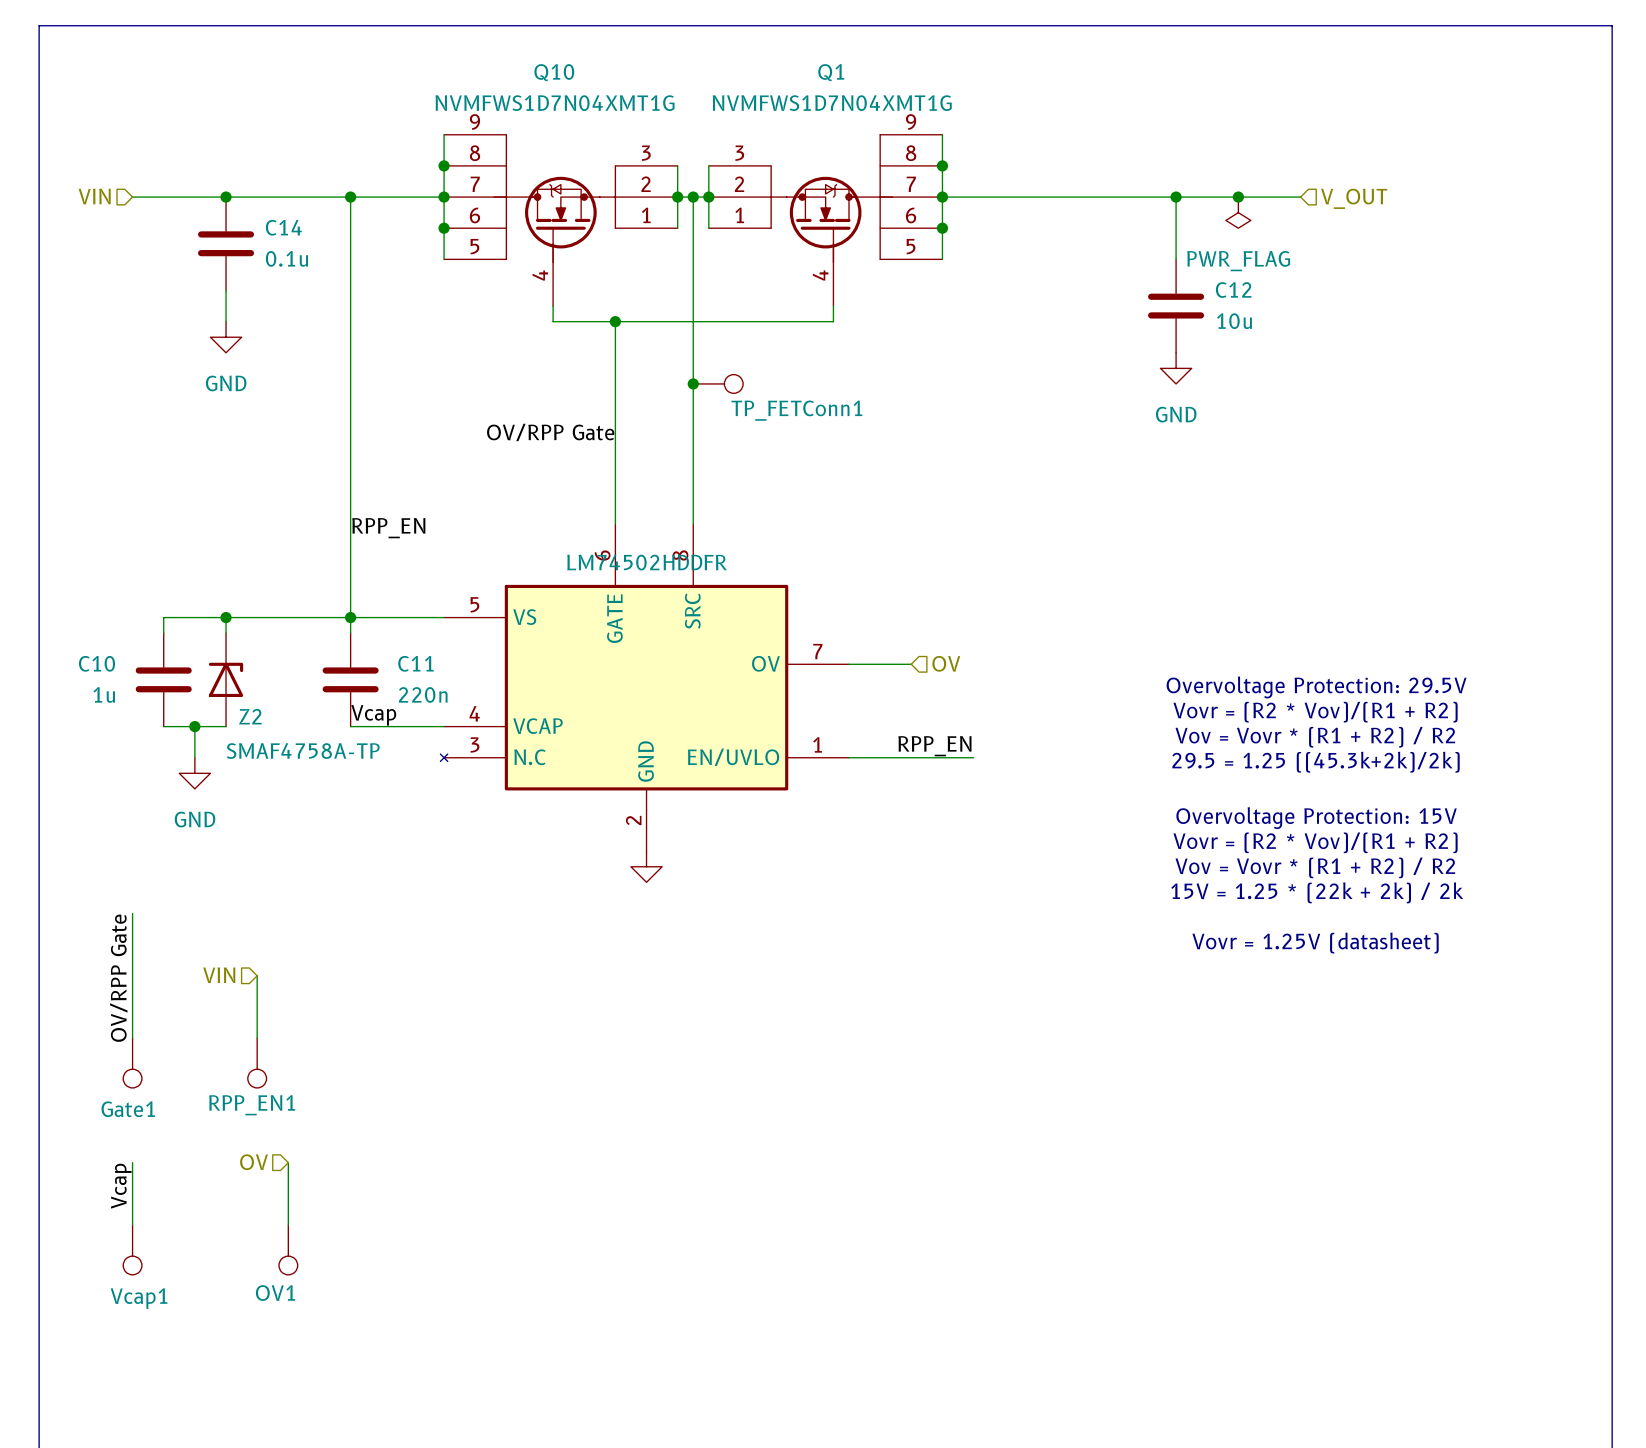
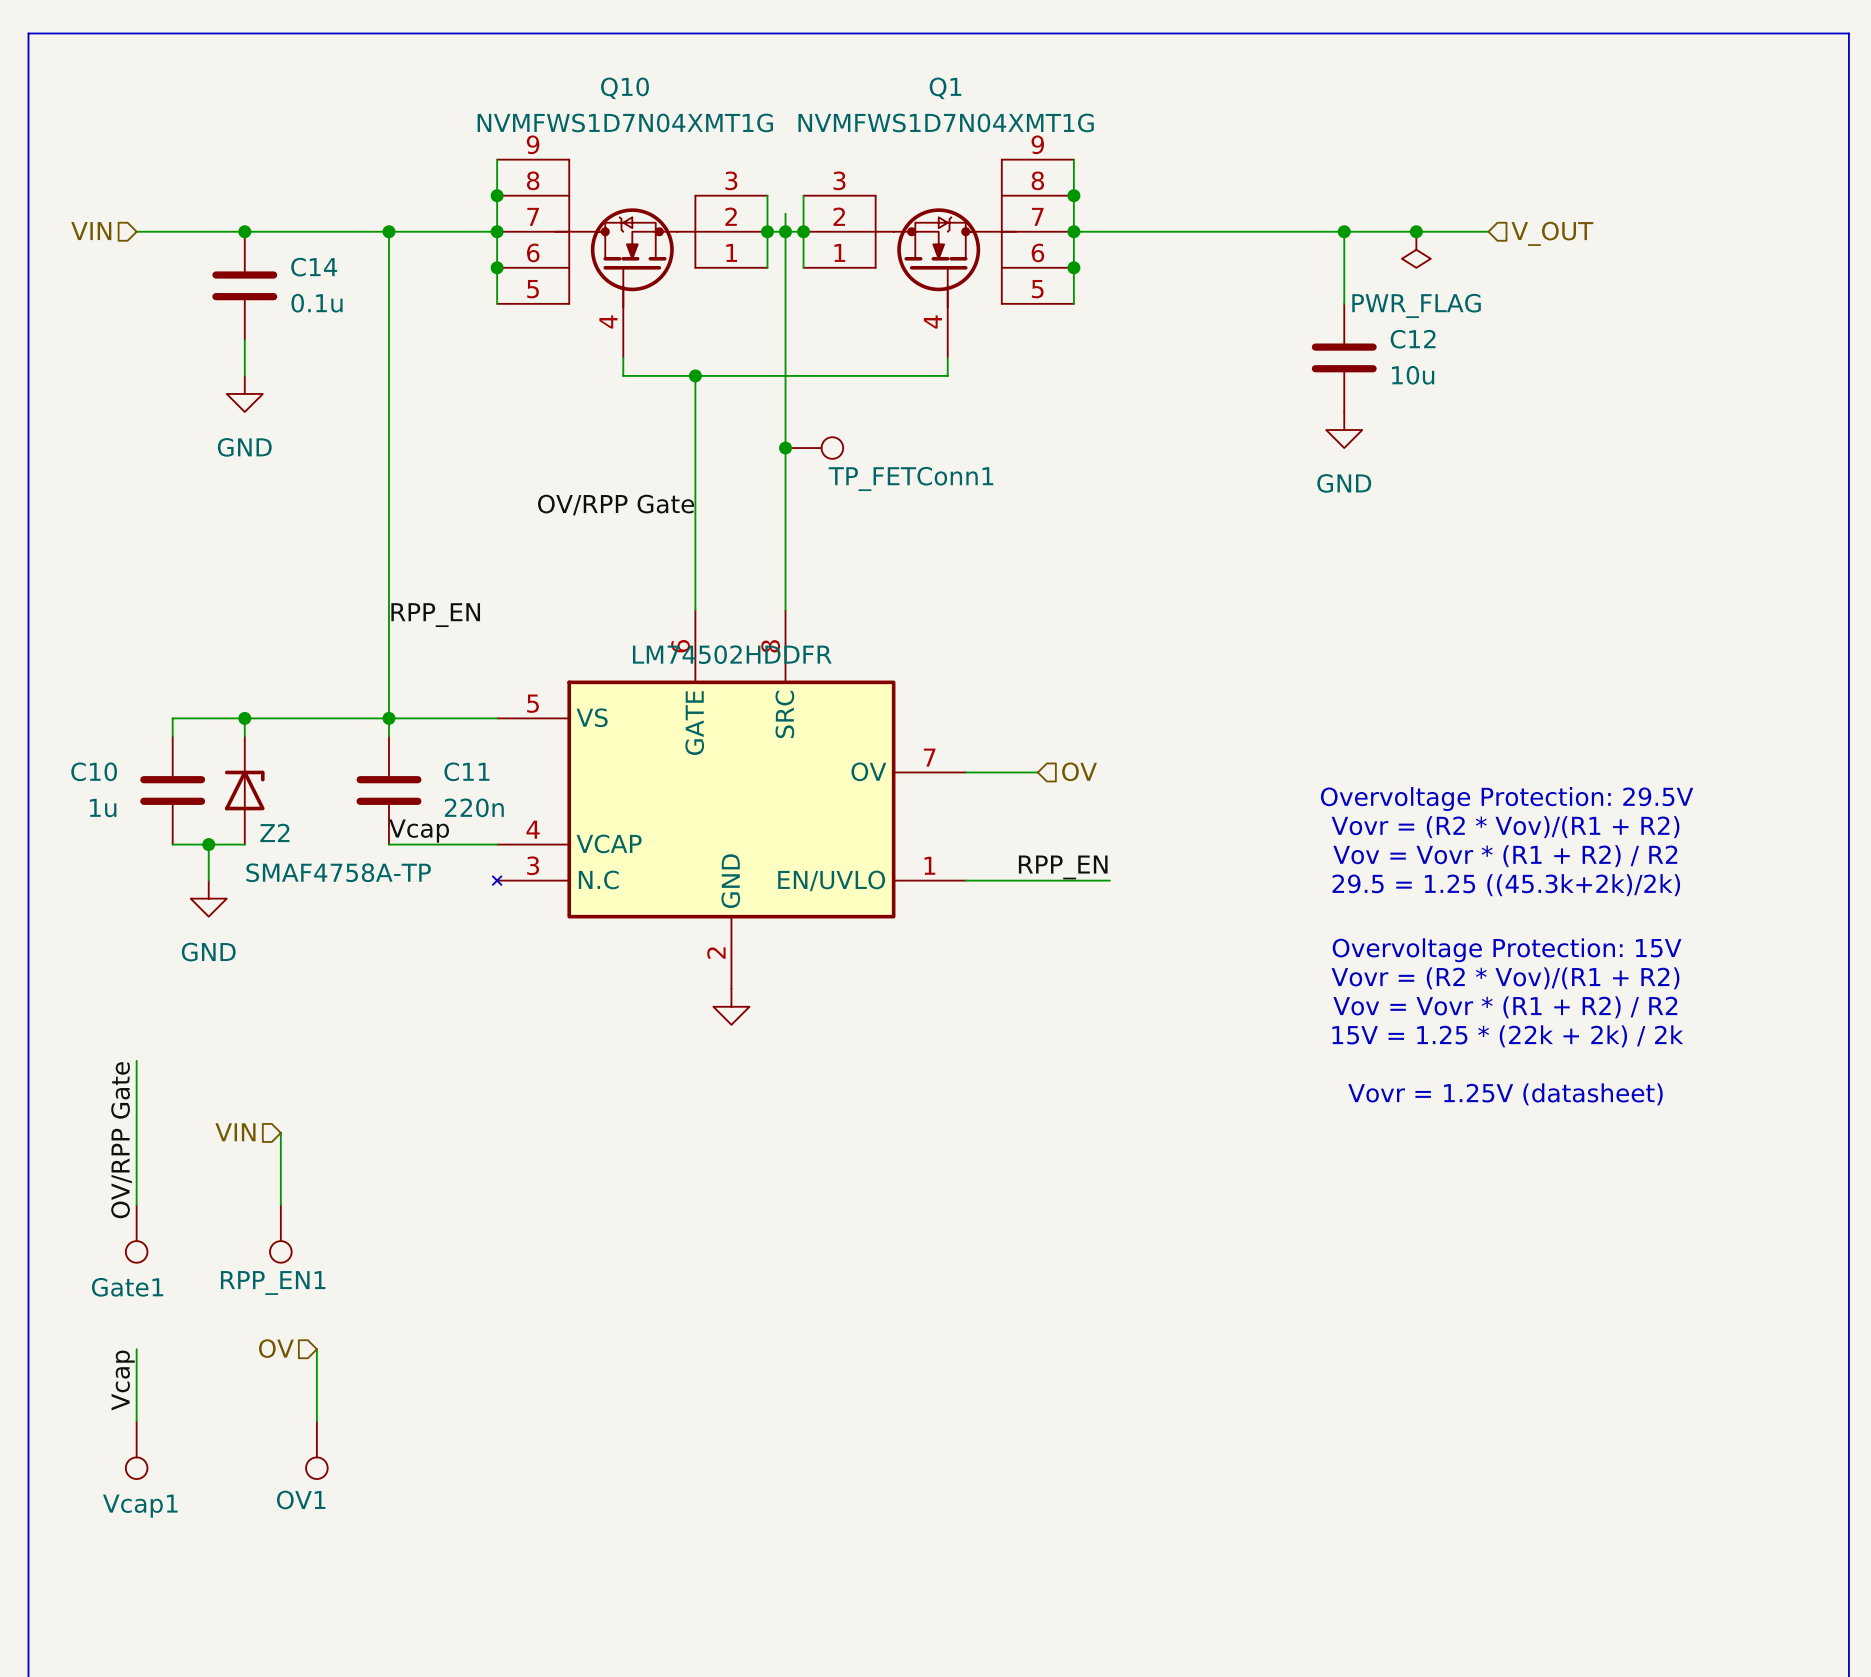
wire: none -> (785, 213) (785, 231)

